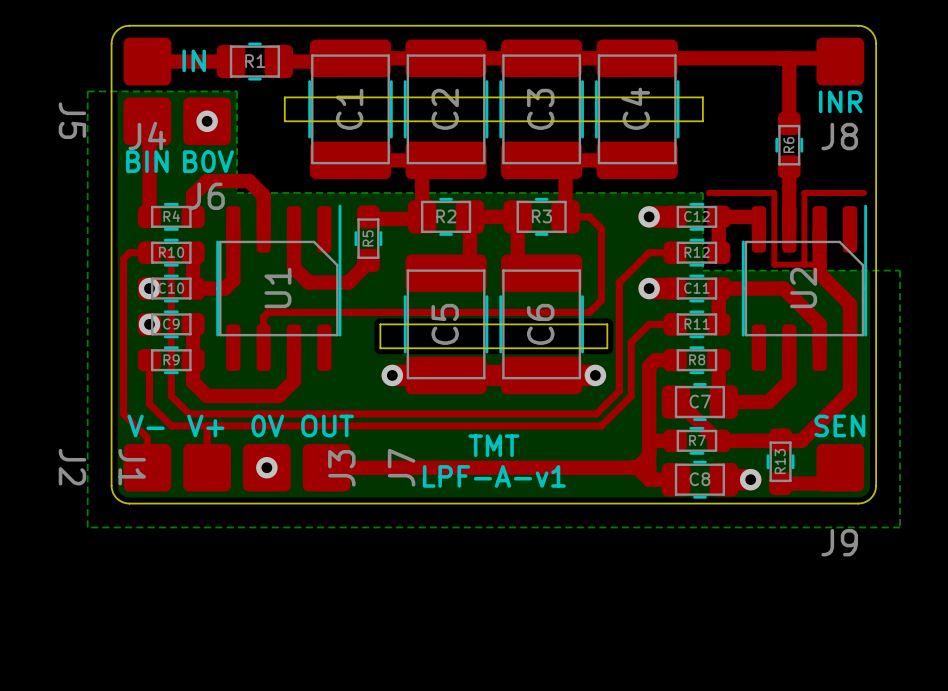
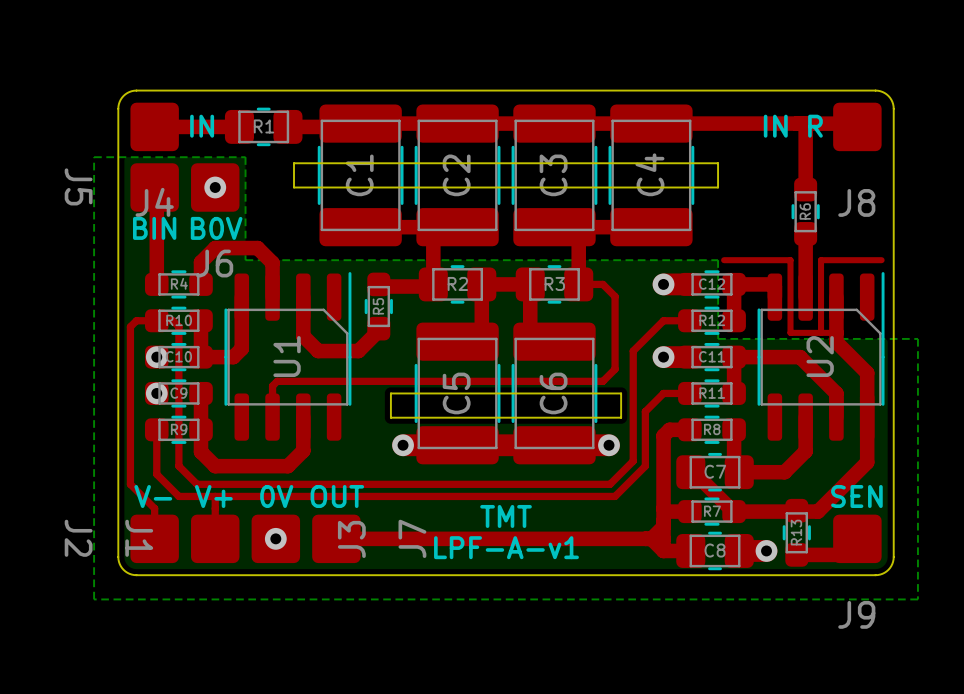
text: none -> IN R (793, 126)
text: INR (840, 101) -> none

